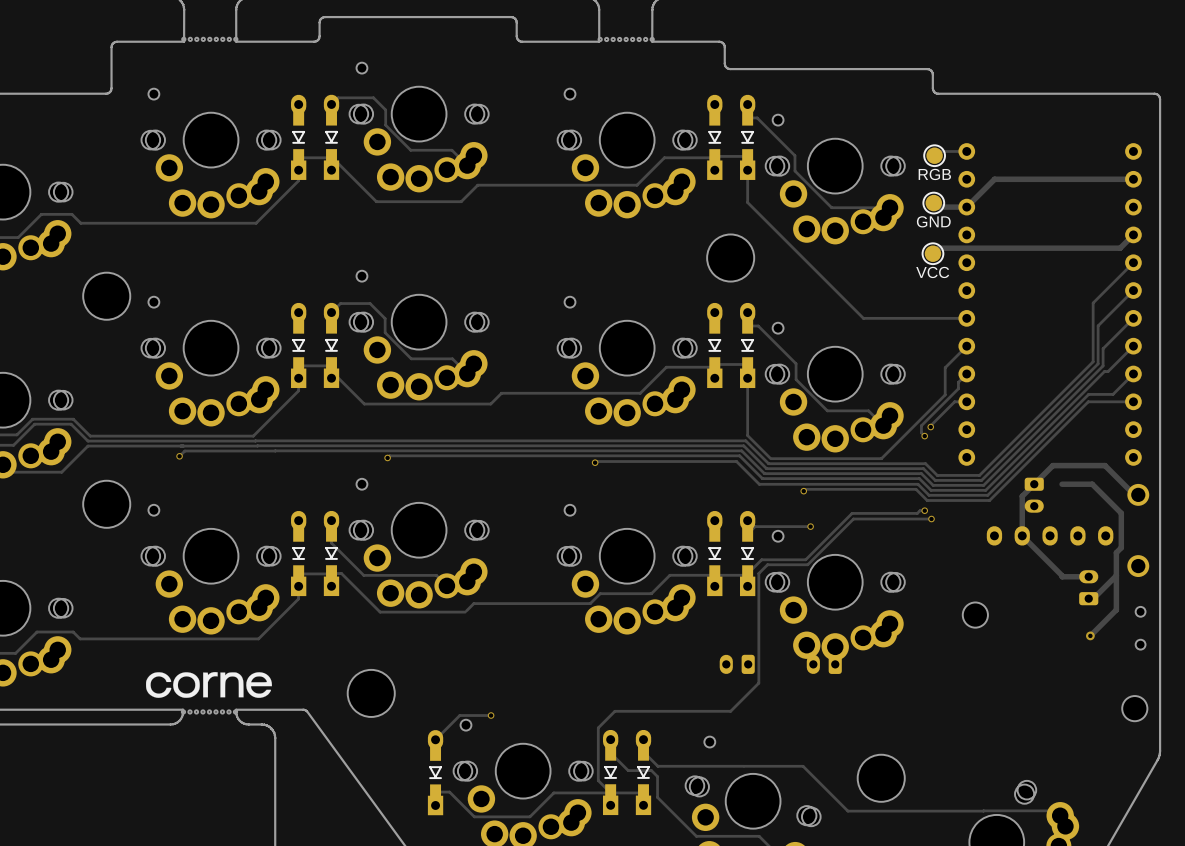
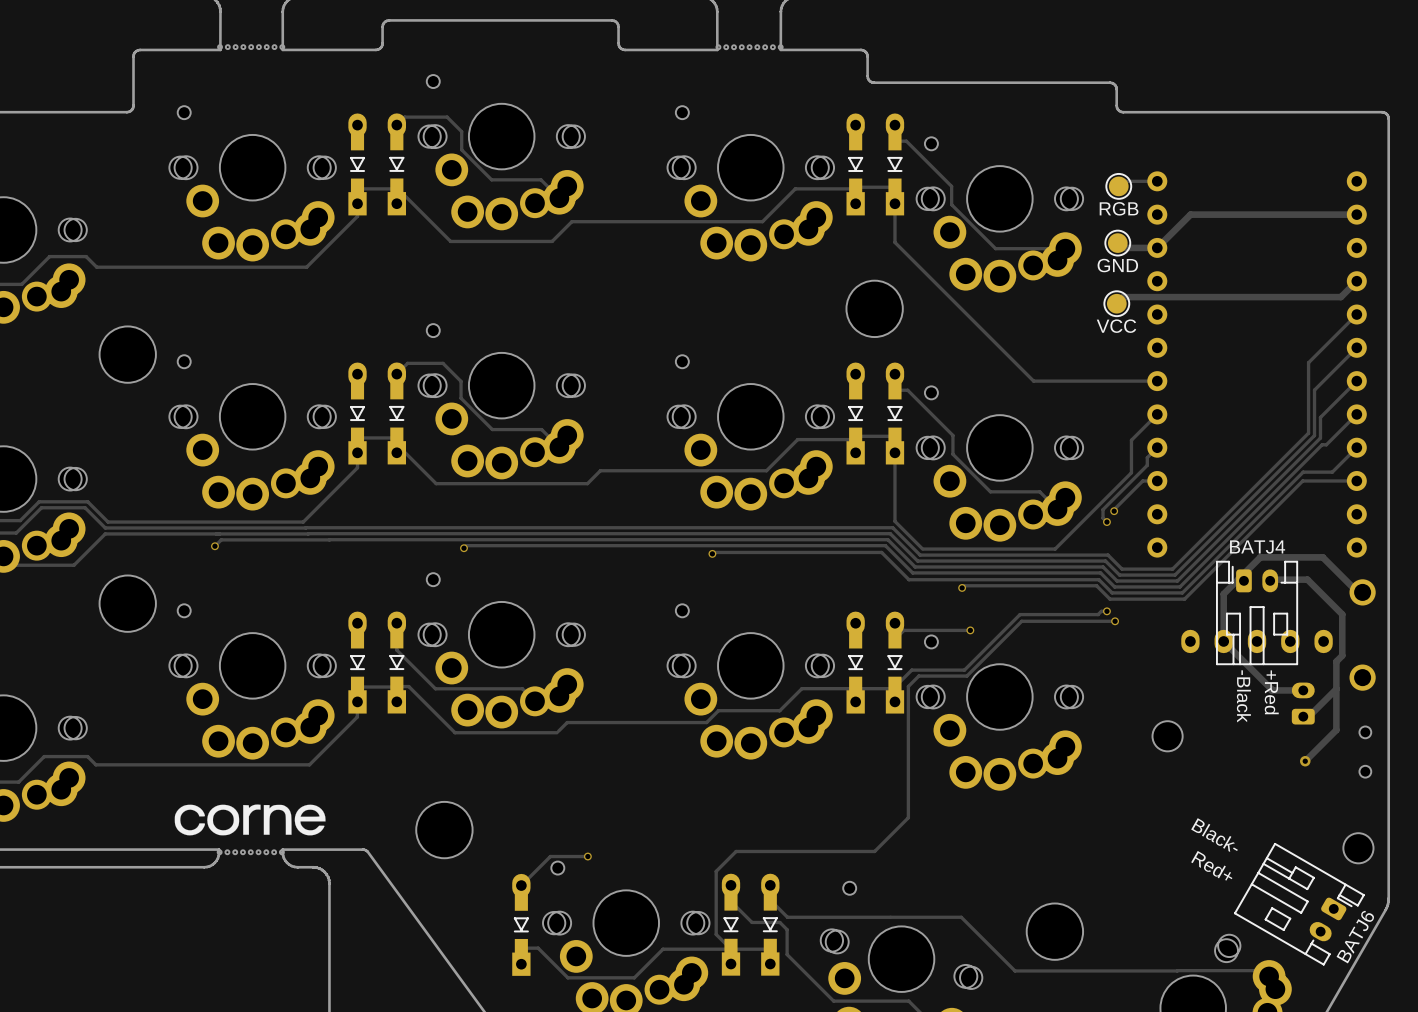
BATJ4 side: top (1034, 495) -> bottom (1257, 612)
text: none -> +Red (1271, 692)
text: none -> -Black (1243, 696)
part: (737, 664) -> none
part: (824, 664) -> none
text: none -> Black- (1214, 835)
text: none -> Red+ (1211, 865)
BATJ6: none -> (1299, 904)

